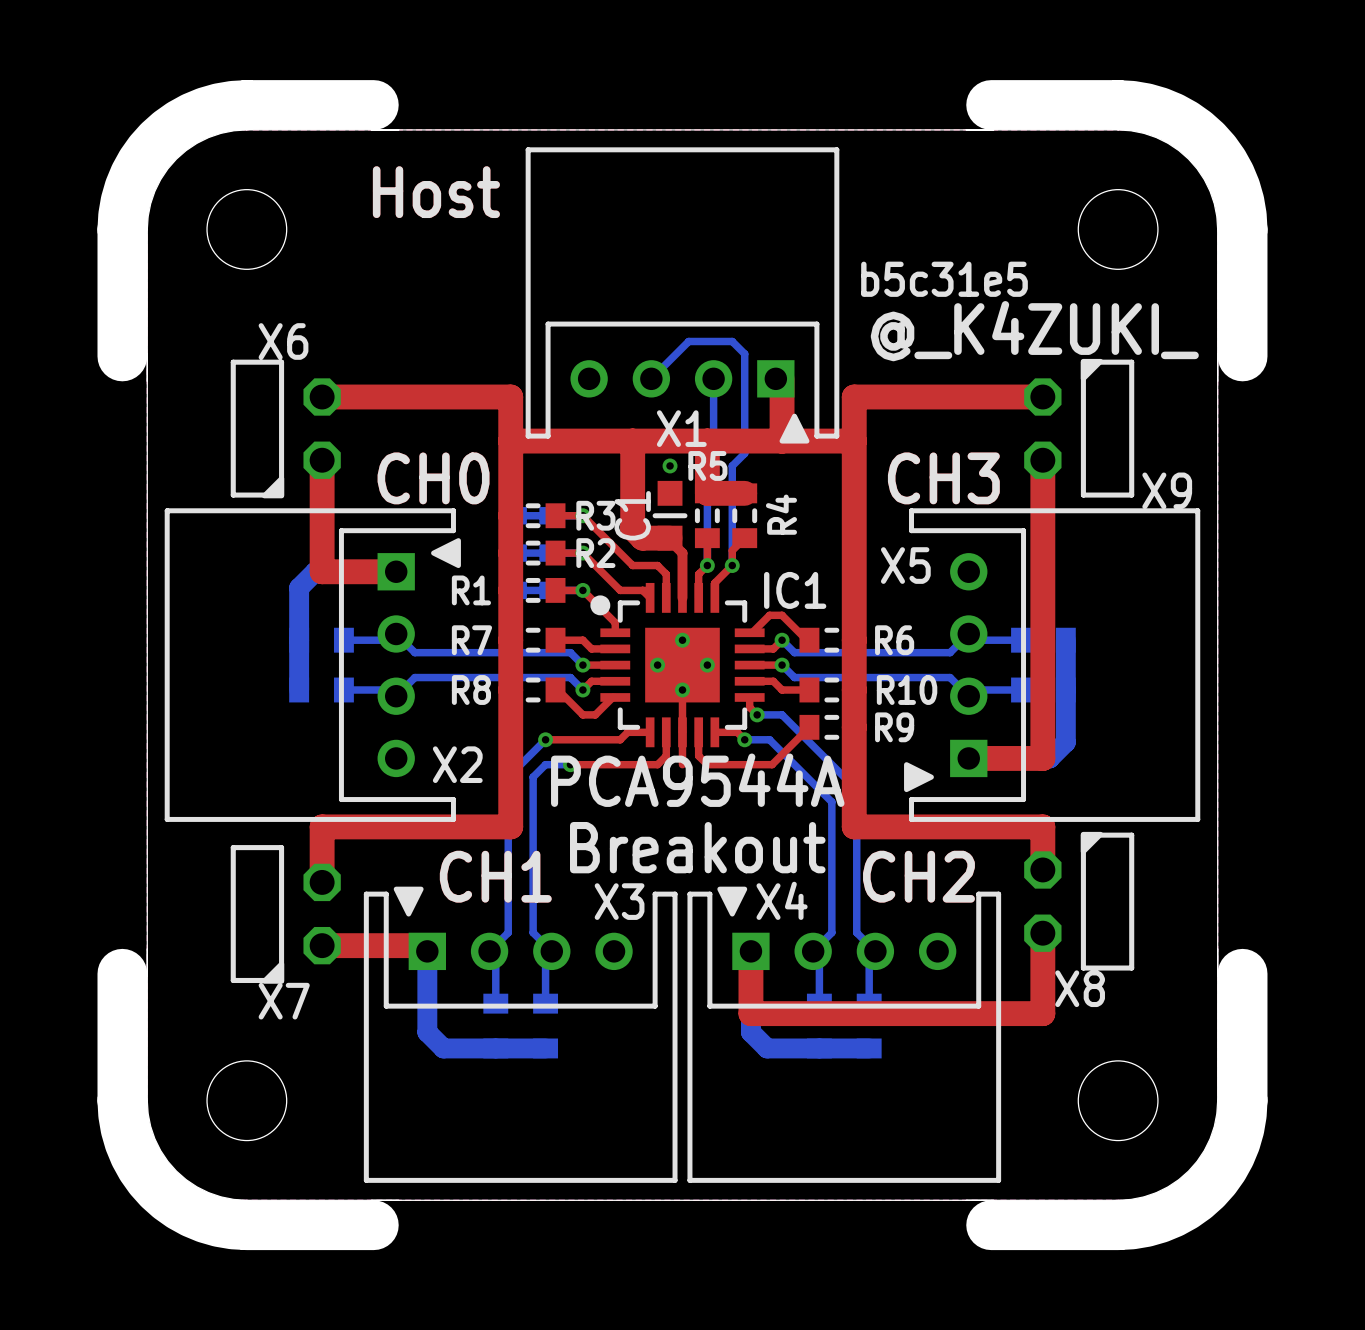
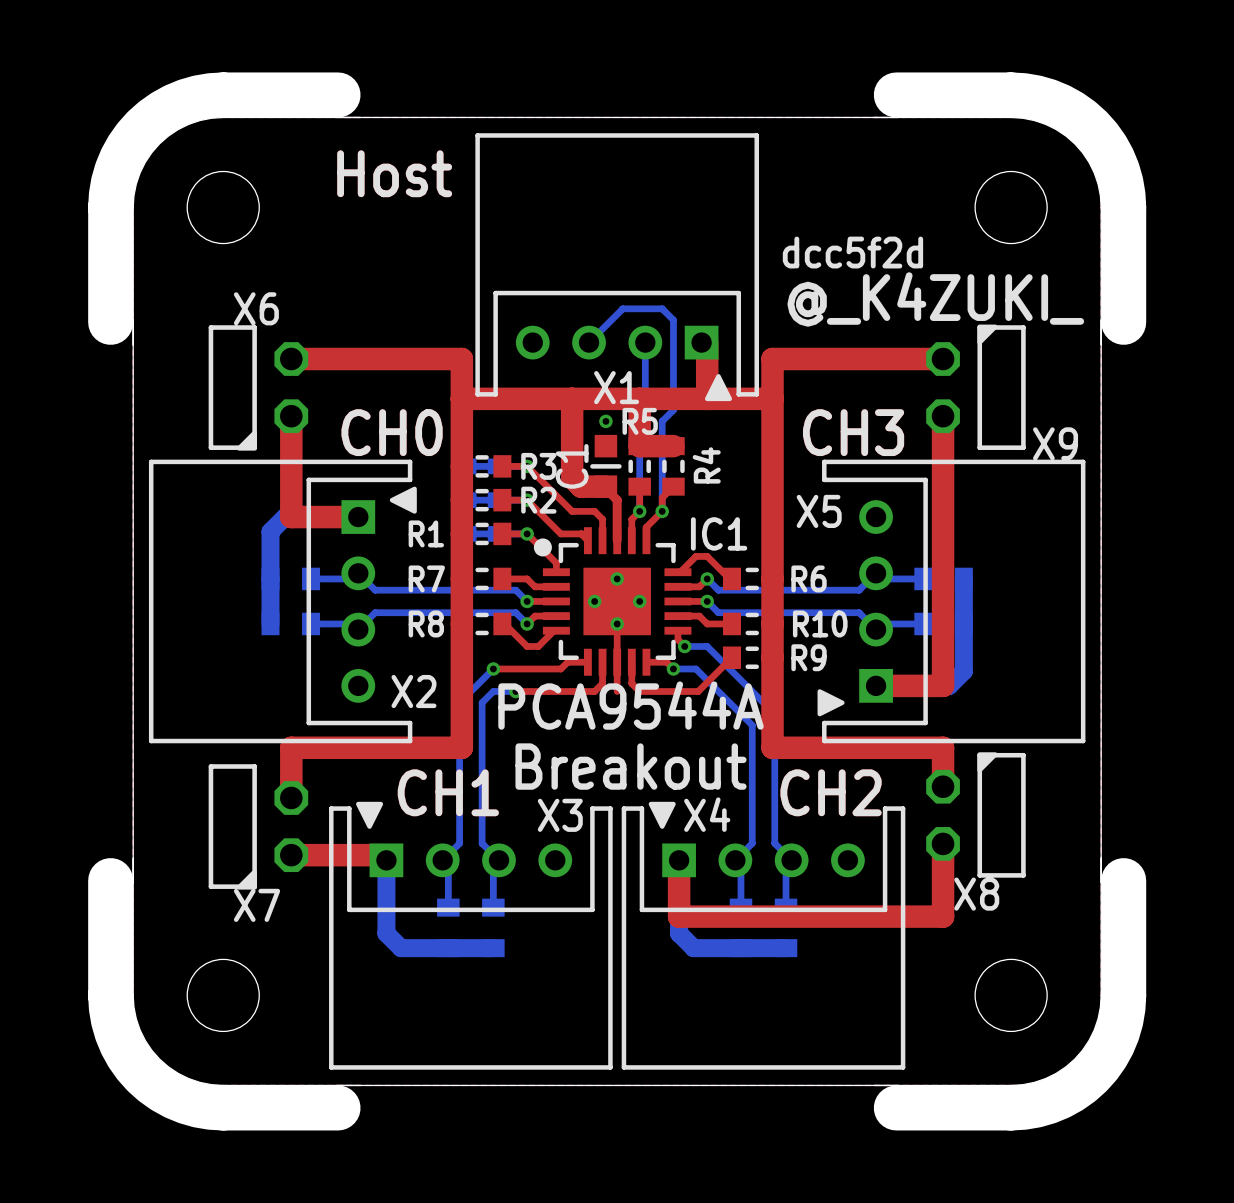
drawing shape: [861, 261, 1028, 297] -> [782, 236, 924, 269]

